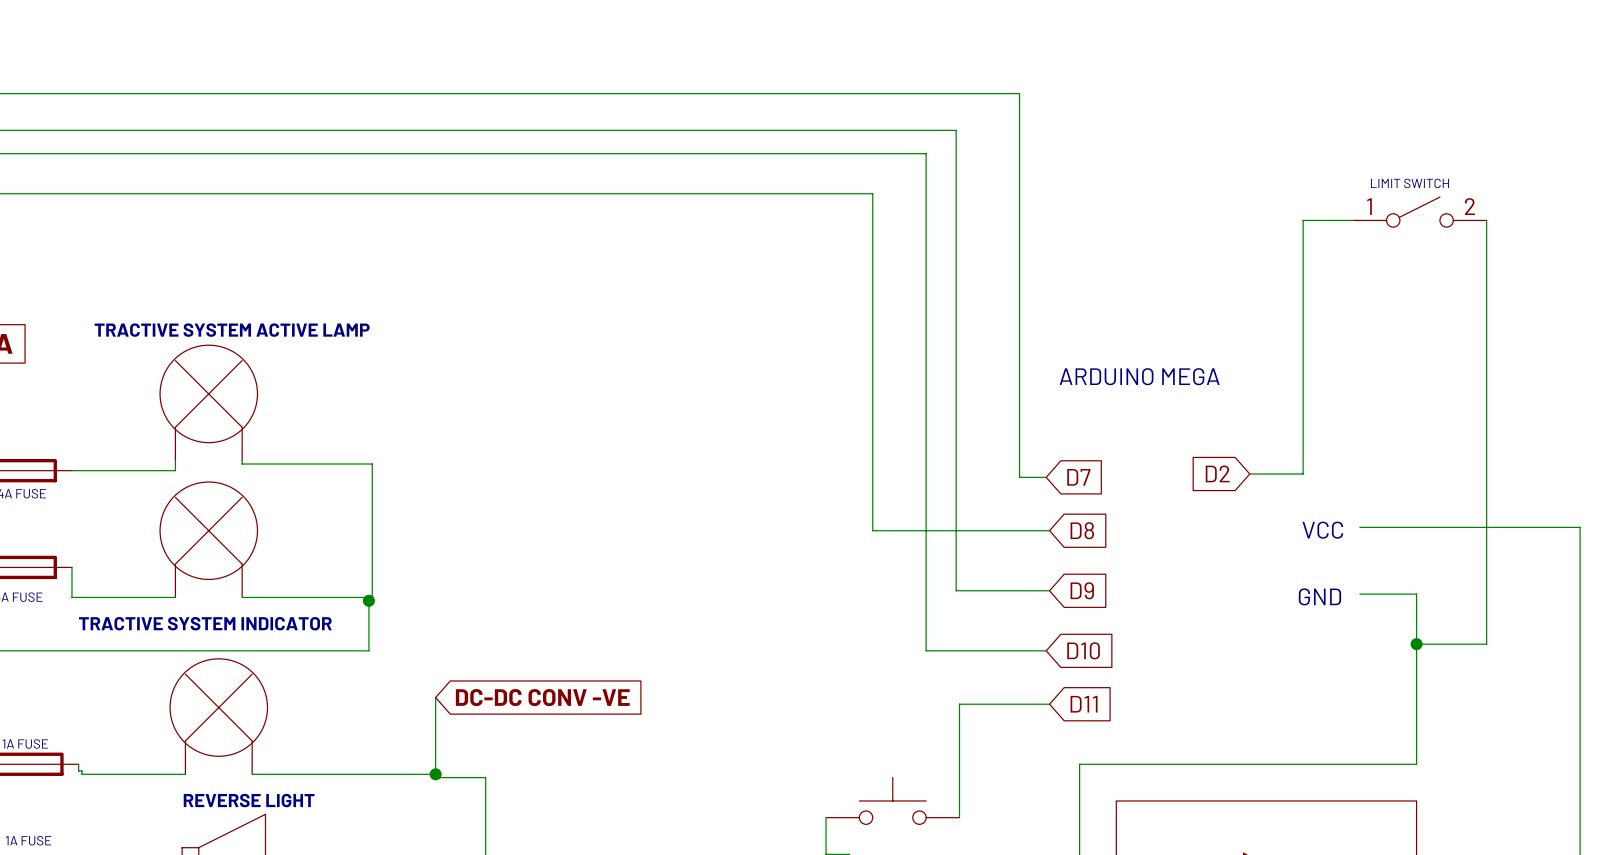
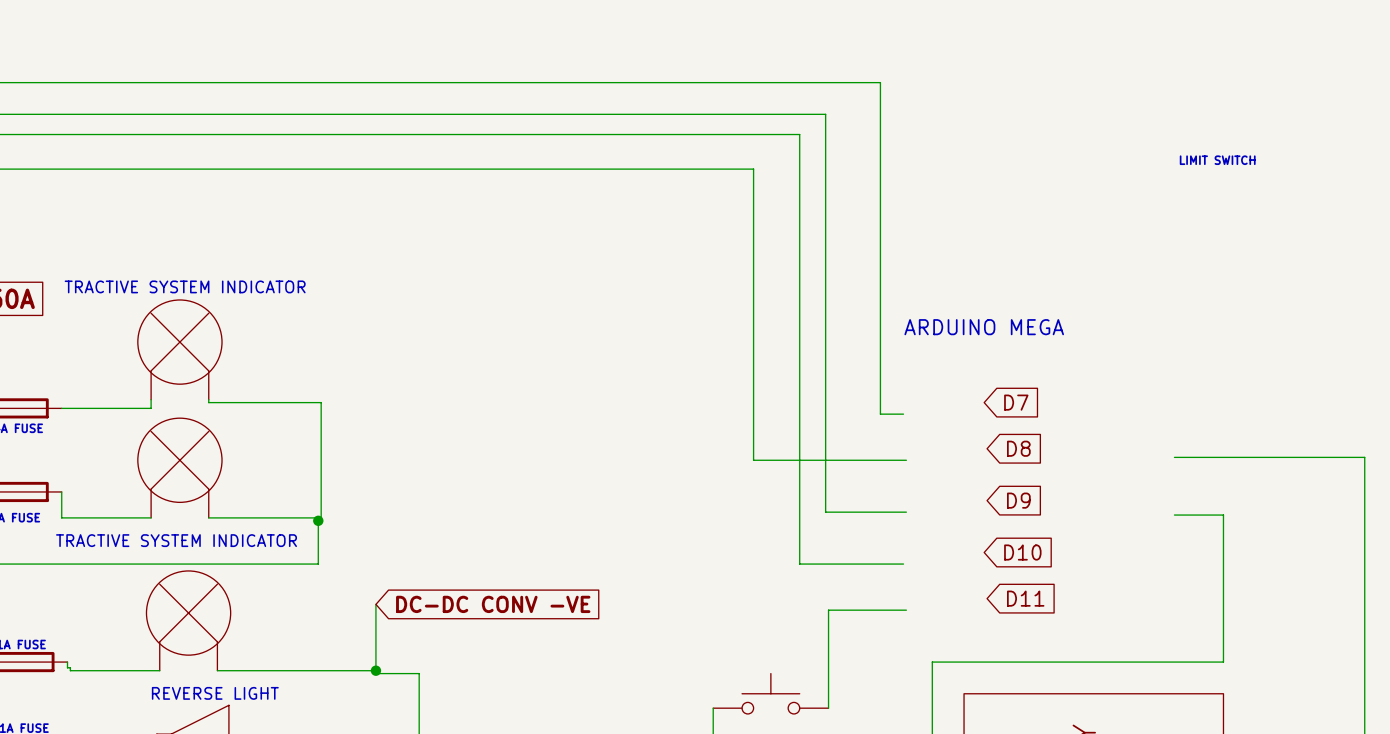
part: (1419, 212) -> none
wire: (1353, 220) (1303, 220) (1303, 474) (1249, 474) -> none
wire: (1486, 220) (1486, 644) (1416, 644) -> none
text: TRACTIVE SYSTEM ACTIVE LAMP (232, 330) -> TRACTIVE SYSTEM INDICATOR (185, 286)
global label: D2 (1217, 473) -> none
global label position: D7 (1078, 477) -> D7 (1016, 402)
global label position: D8 (1082, 530) -> D8 (1018, 448)
text: VCC (1322, 530) -> none
global label position: D9 (1082, 590) -> D9 (1018, 500)
text: GND (1319, 596) -> none
junction: (1416, 644) -> none
global label position: D10 (1083, 650) -> D10 (1022, 552)
global label position: D11 (1084, 704) -> D11 (1025, 598)

